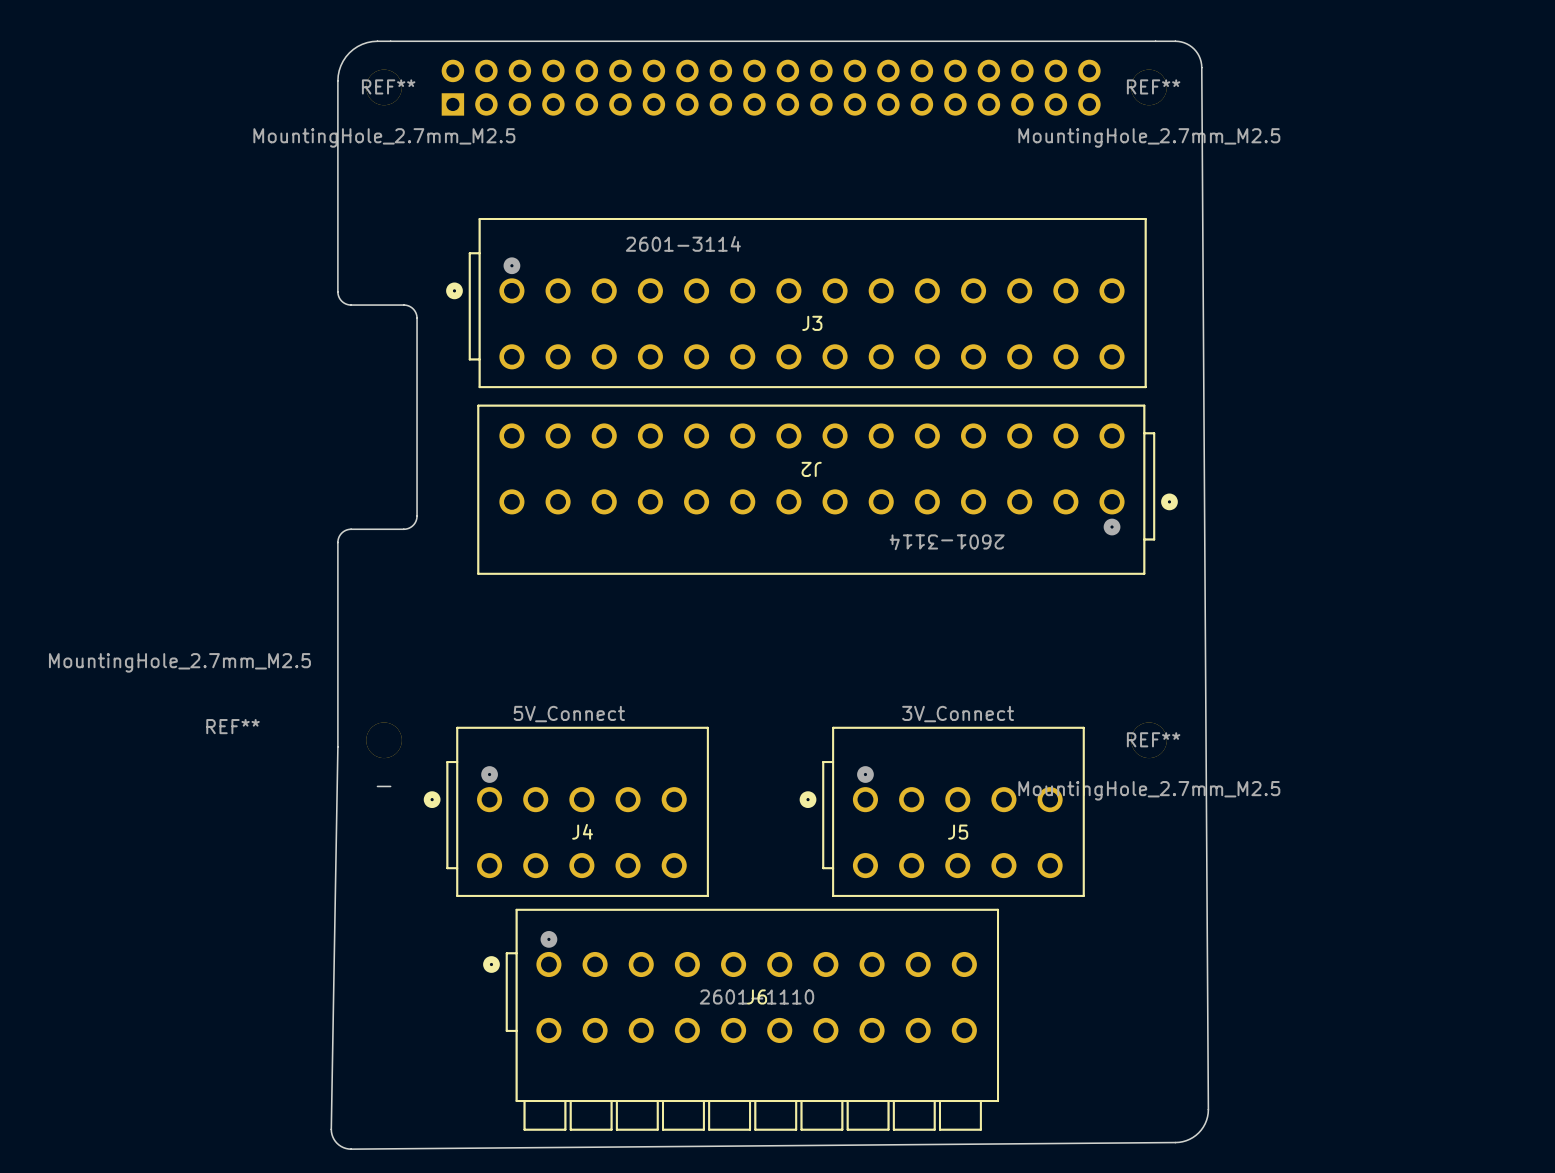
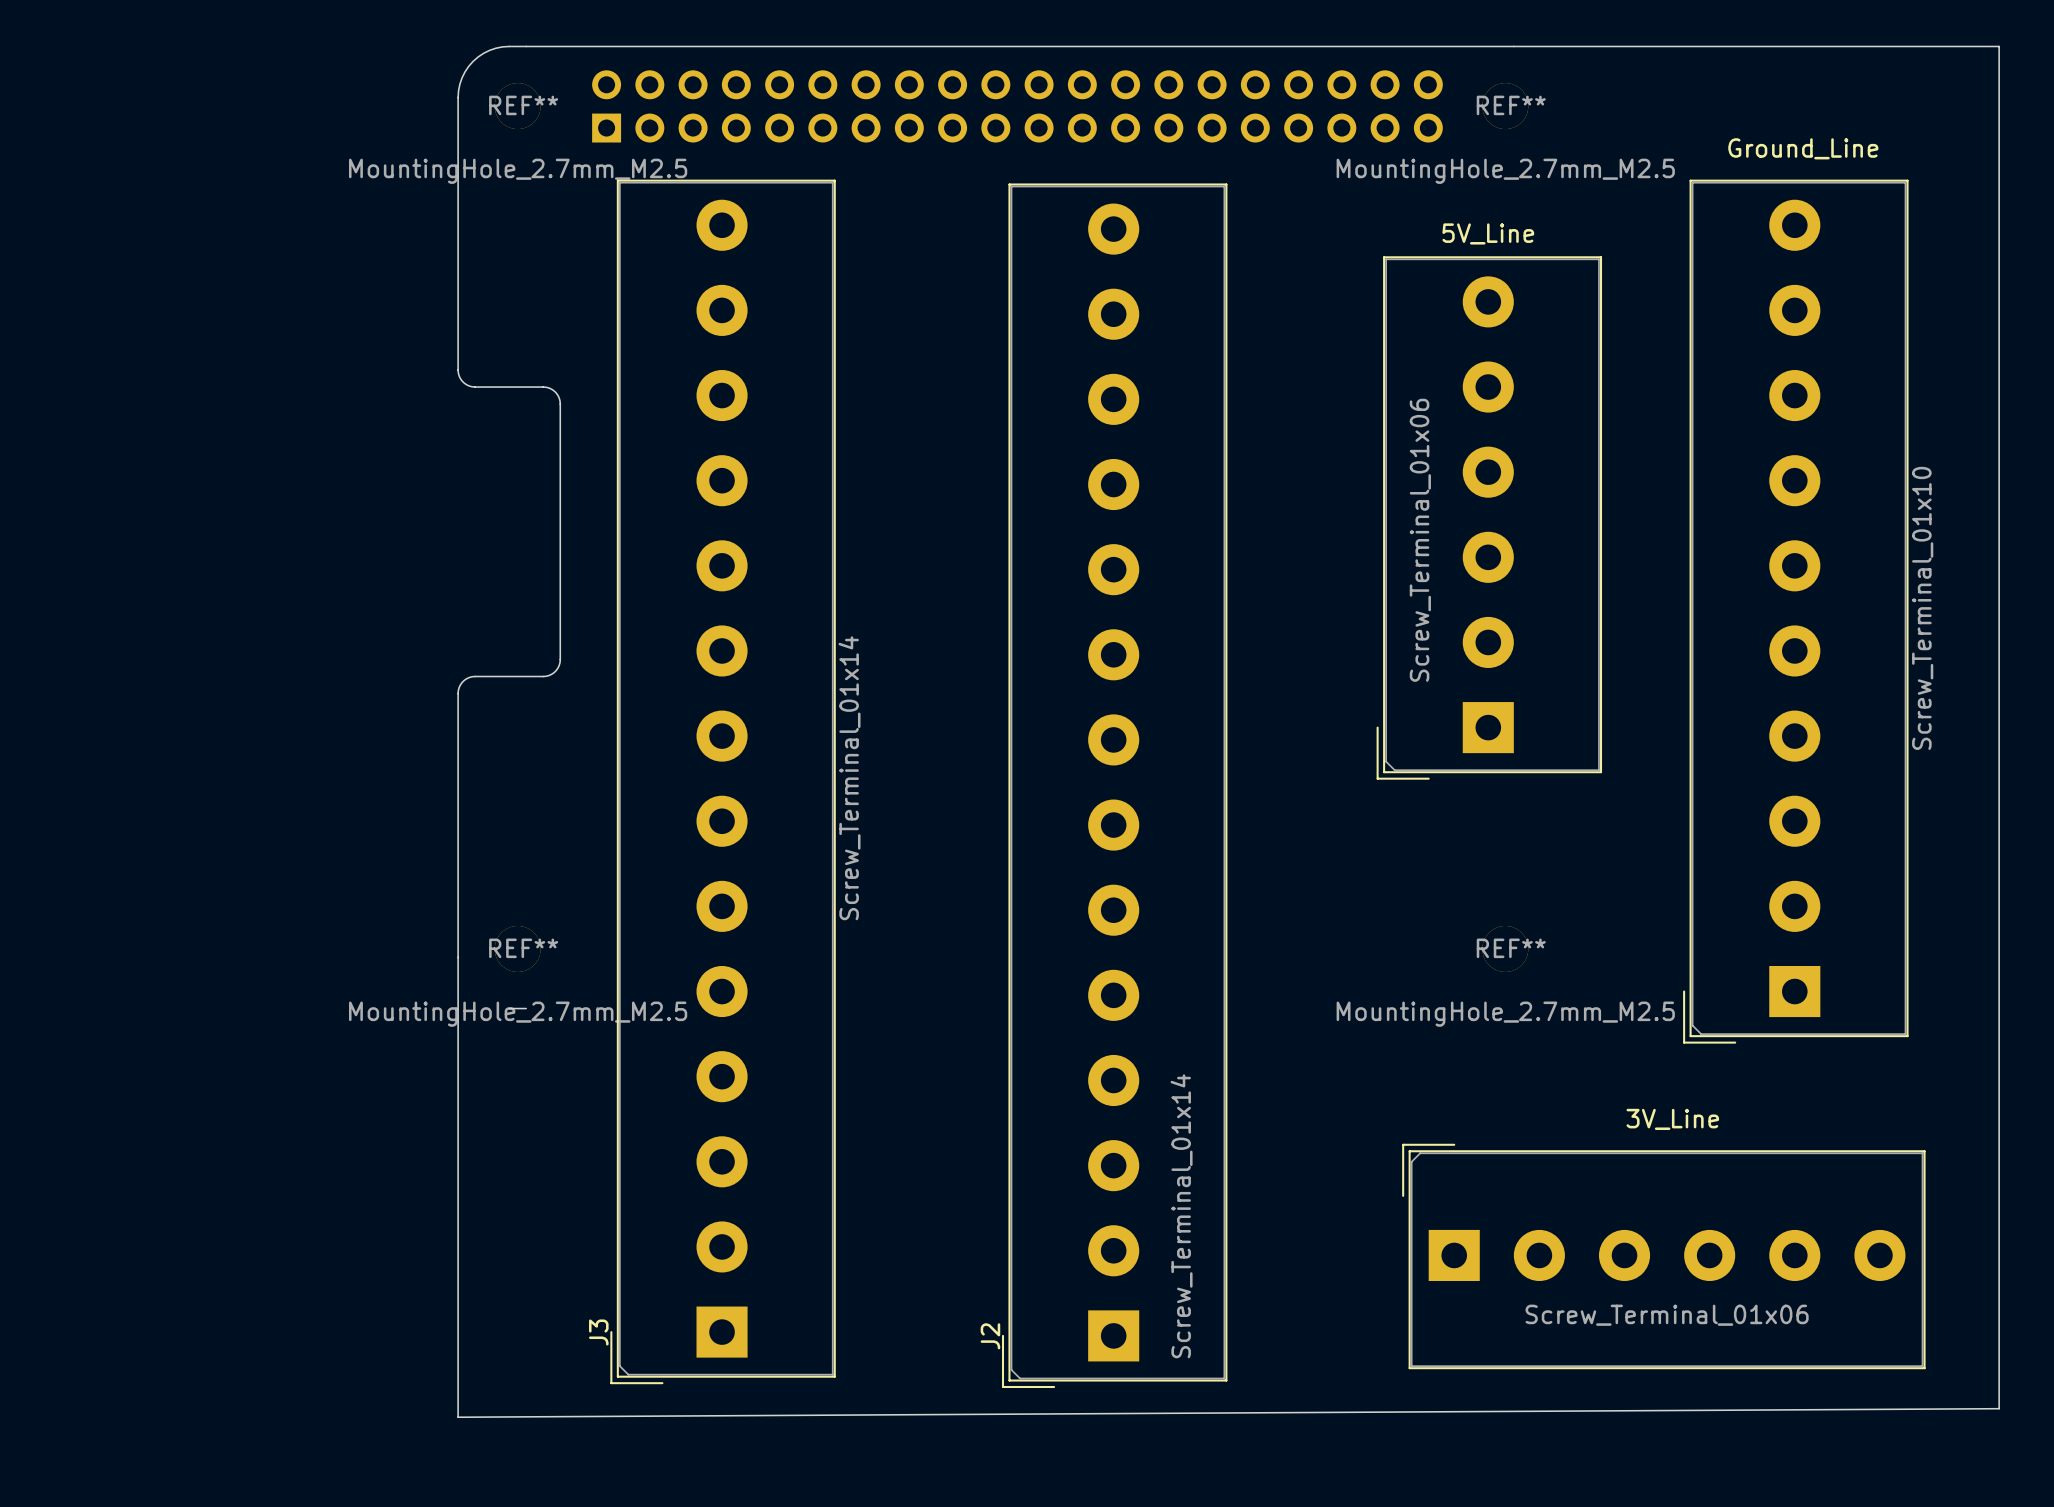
board edge: (1175, 41) (1186, 43) (1194, 48) (1200, 58) (1201, 67) (1208, 1109) (1205, 1123) (1195, 1135) (1186, 1140) (1175, 1142) (351, 1149) (343, 1147) (333, 1139) (331, 1129) (337, 746) -> (1539, 46) (1999, 46) (1999, 1408) (458, 1417) (458, 957)
J3 footprint: [446, 217, 1147, 389] -> [610, 179, 836, 1385]
J3 value: 2601-3114 (683, 243) -> Screw_Terminal_01x14 (849, 778)
J3 name position: J3 (812, 323) -> J3 (598, 1332)
J2 footprint: [477, 404, 1178, 575] -> [1001, 183, 1228, 1389]
5V_Line: none -> Screw_Terminal_01x06 (1489, 517)
J2 name position: J2 (811, 469) -> J2 (990, 1336)
Ground_Line: none -> Screw_Terminal_01x10 (1795, 611)
J2 value: 2601-3114 (947, 542) -> Screw_Terminal_01x14 (1181, 1216)
REF** value position: MountingHole_2.7mm_M2.5 (179, 662) -> MountingHole_2.7mm_M2.5 (518, 1014)
REF** name position: REF** (233, 726) -> REF** (523, 948)
J4: 5V_Connect (566, 811) -> none
J5: 3V_Connect (942, 811) -> none
3V_Line: none -> Screw_Terminal_01x06 (1663, 1256)
J6: 2601-1110 (741, 1019) -> none

